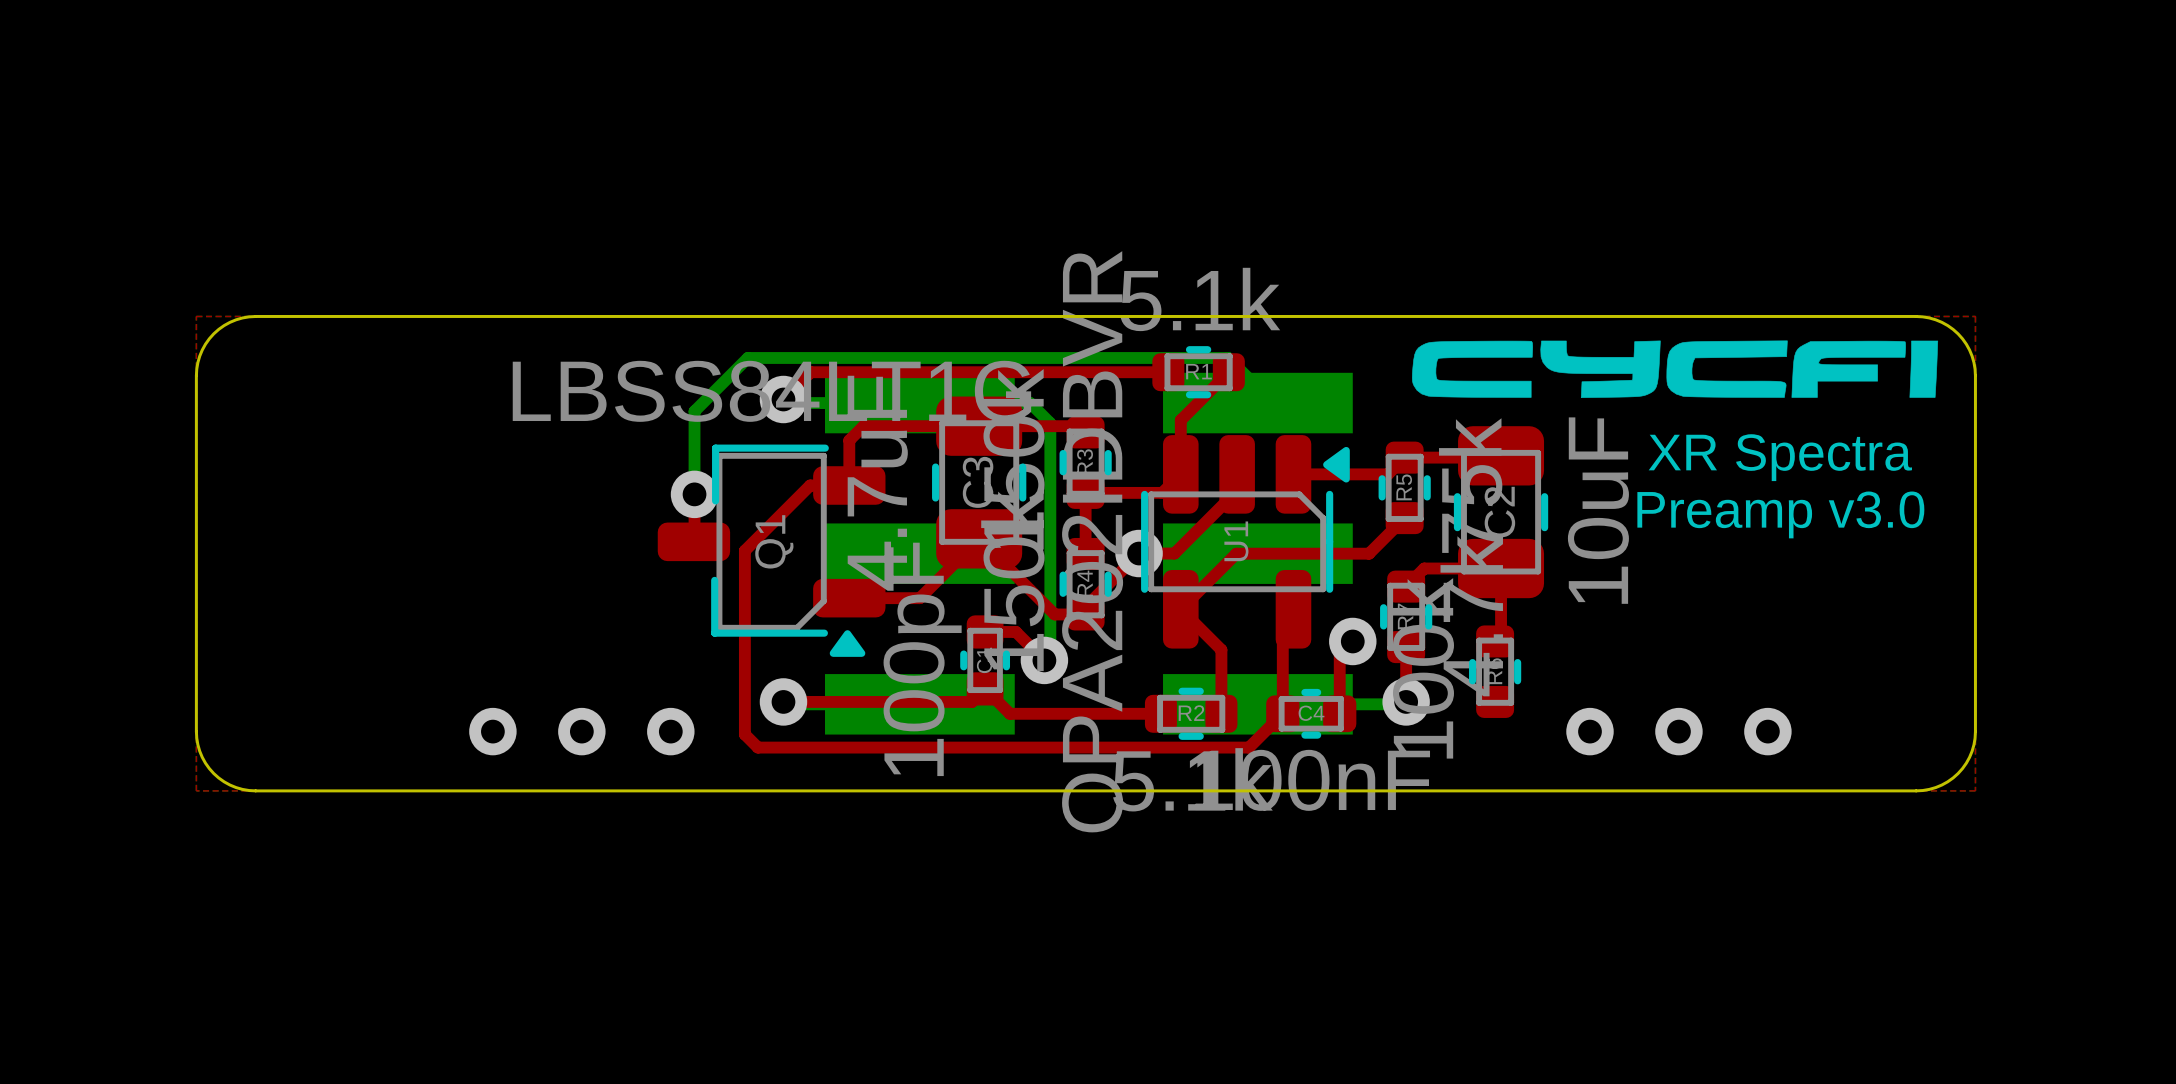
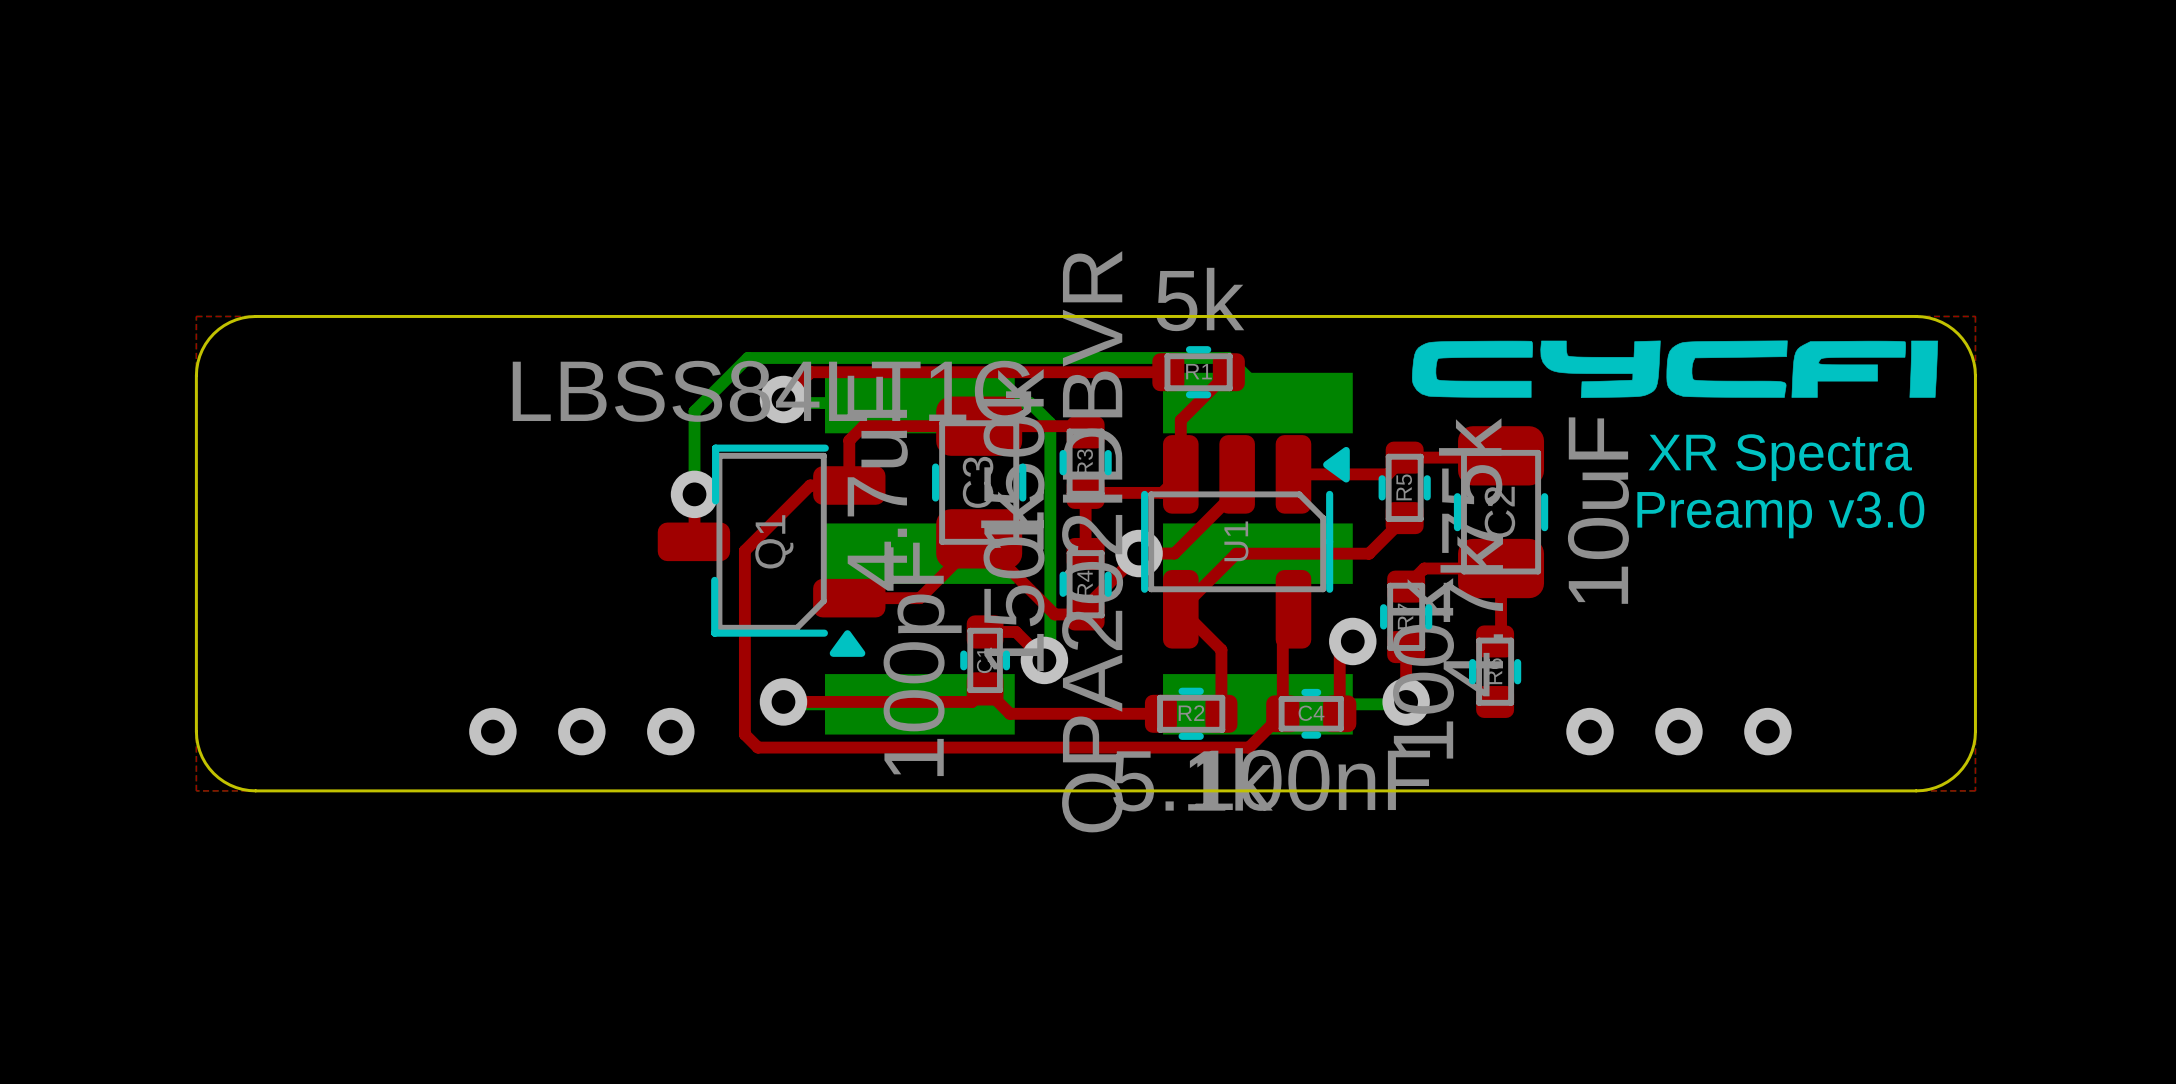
R1 value: 5.1k (1200, 299) -> 5k (1200, 299)

